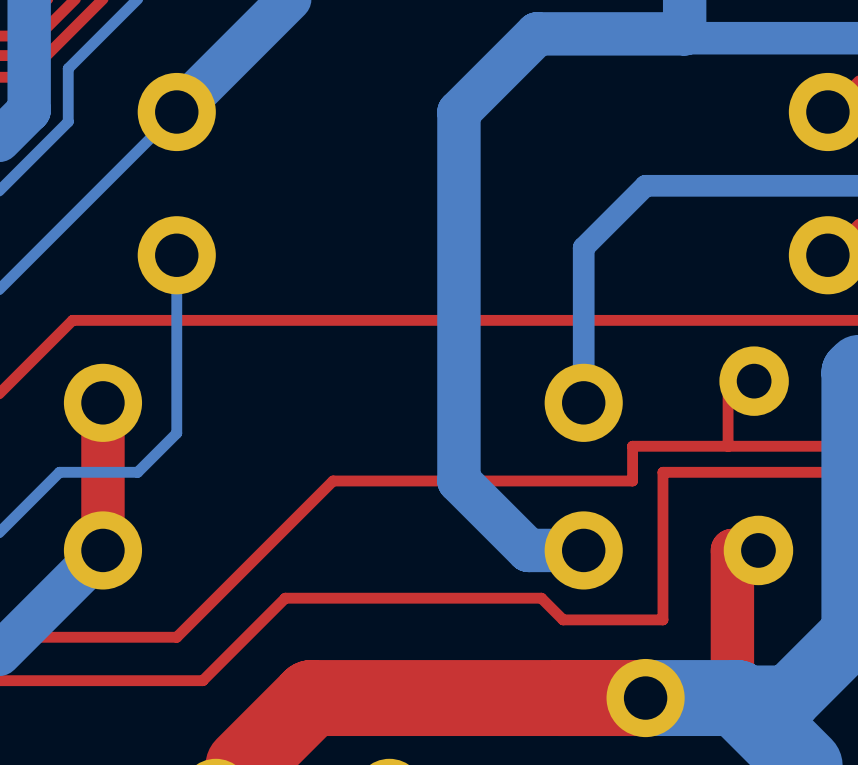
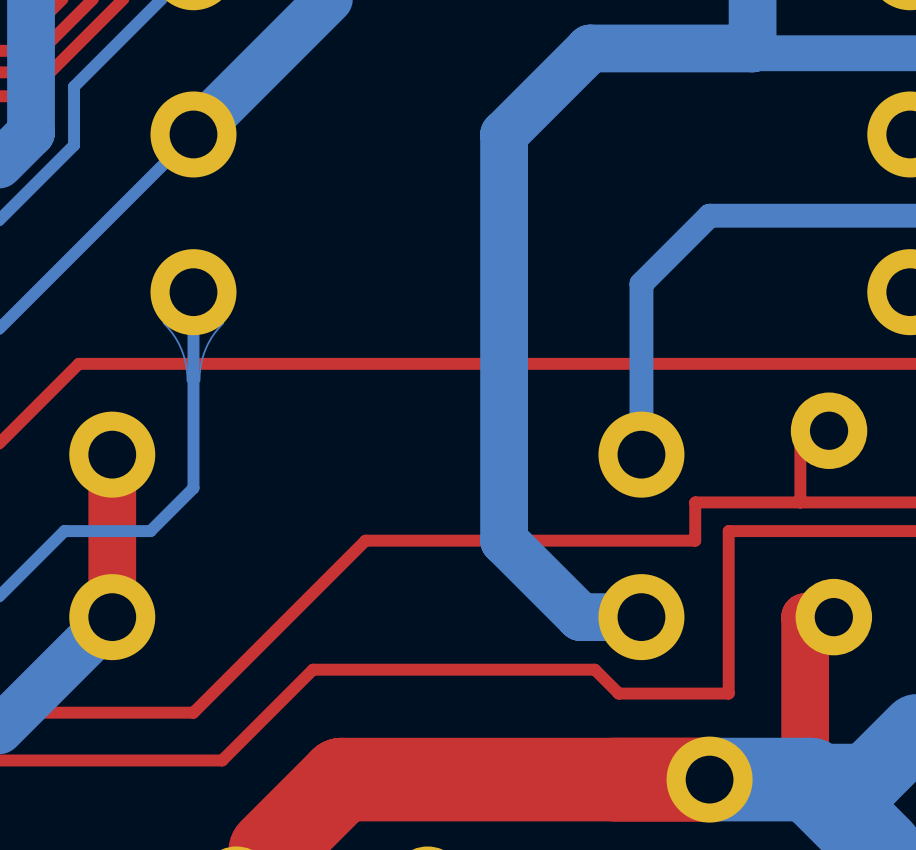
bottom zone outline: none -> (193, 270) (163, 322) (172, 332) (181, 349) (185, 361) (187, 381) (199, 381) (201, 361) (205, 349) (214, 332) (223, 322) (193, 270)

